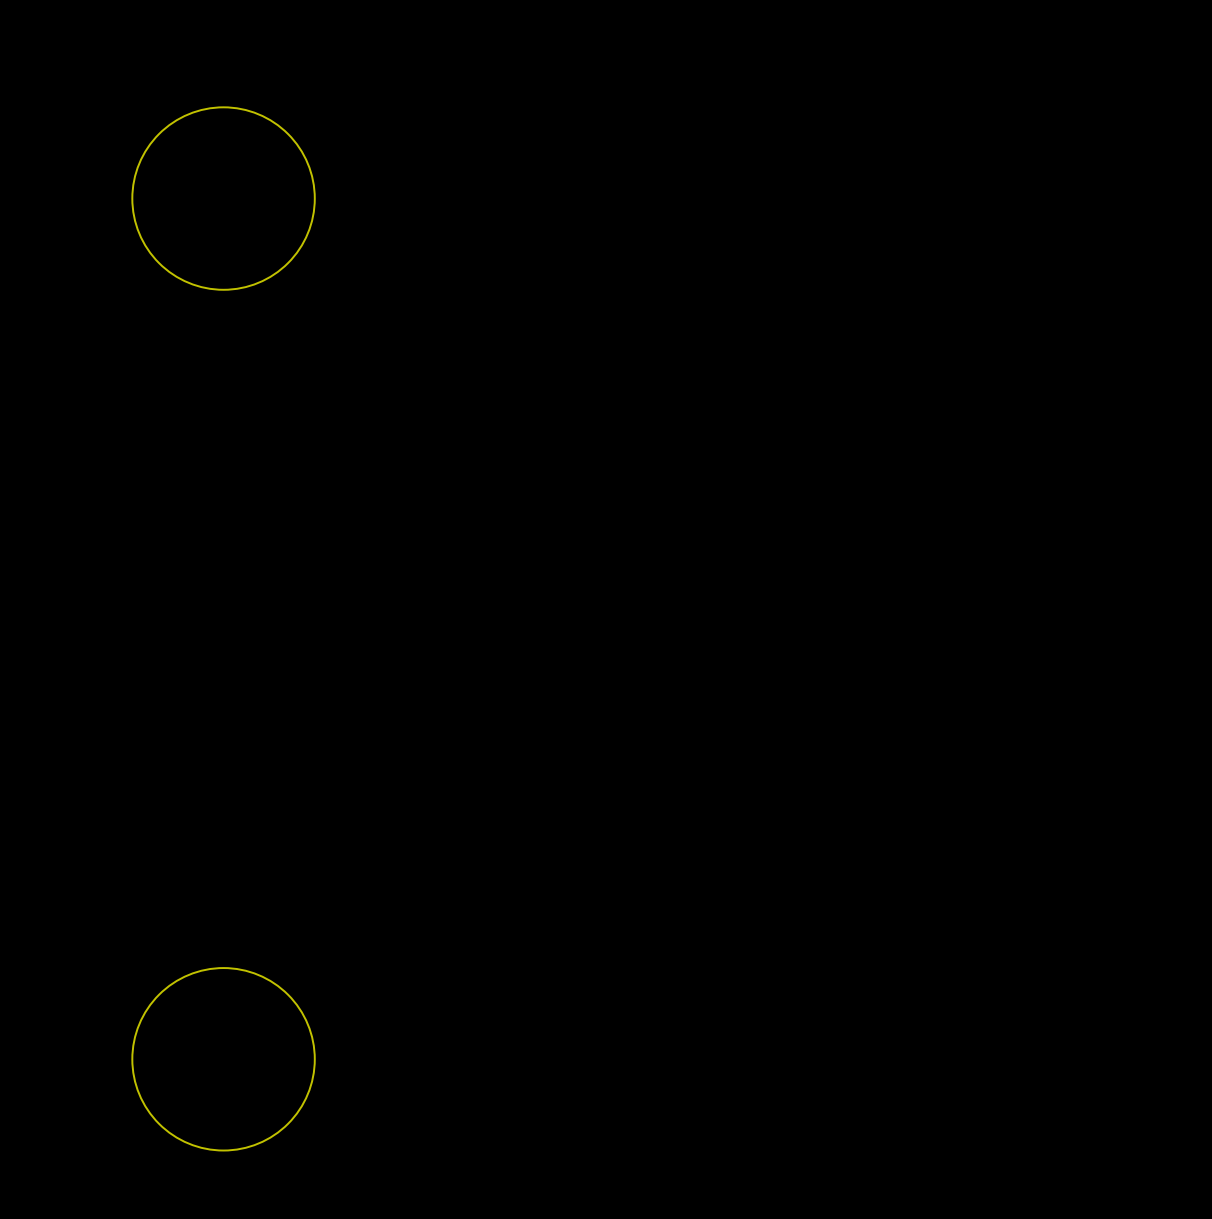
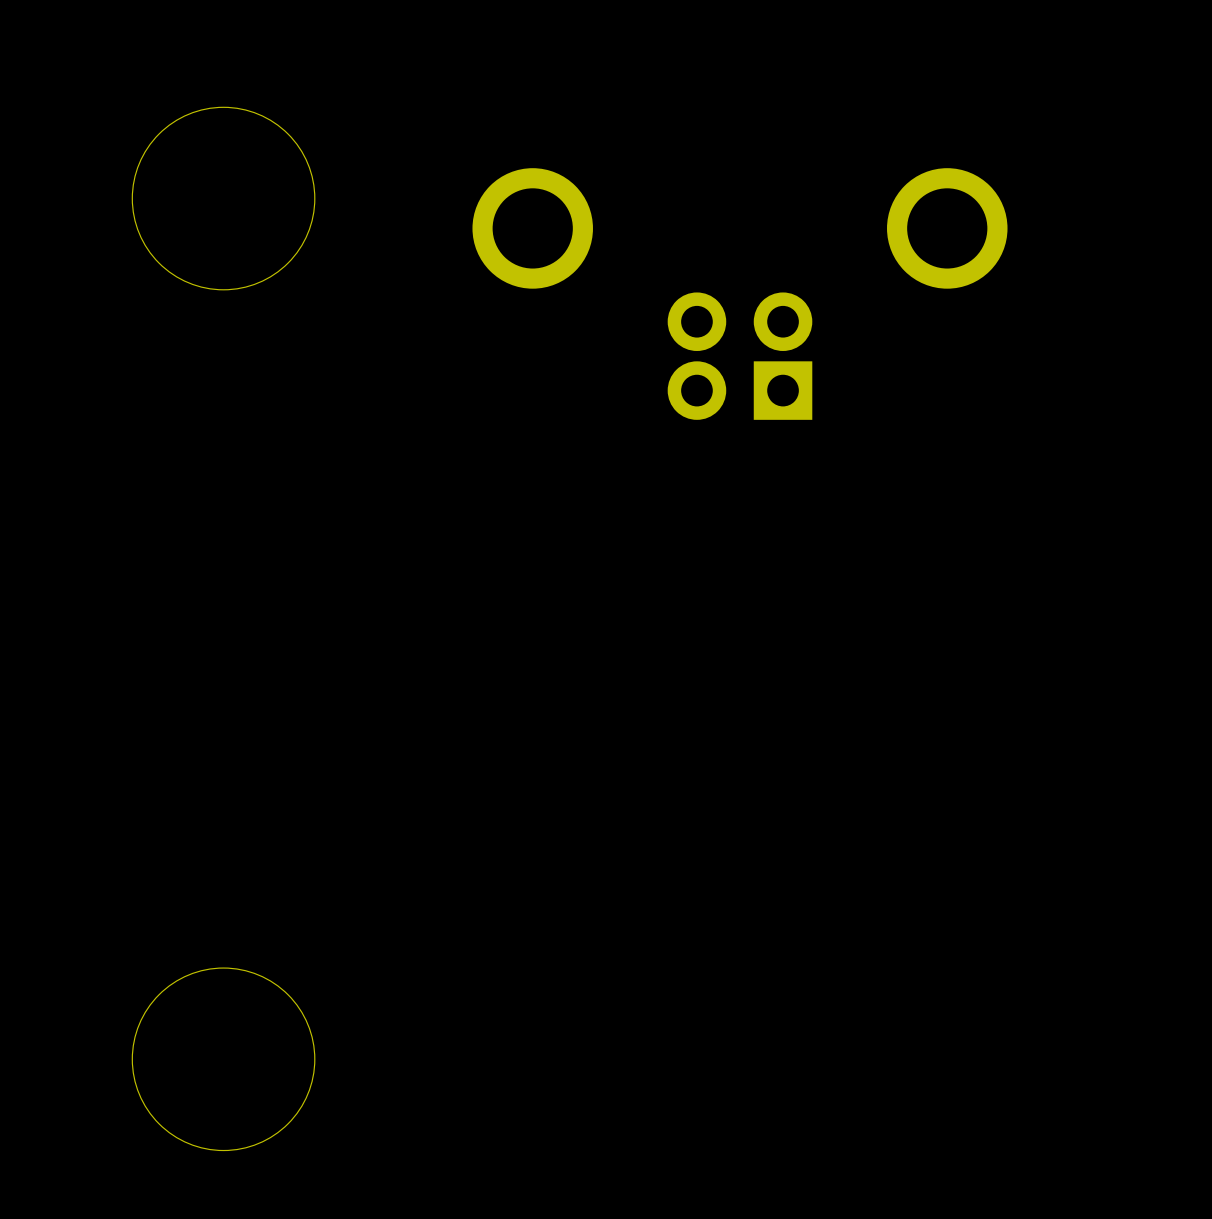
part: none -> (739, 294)

